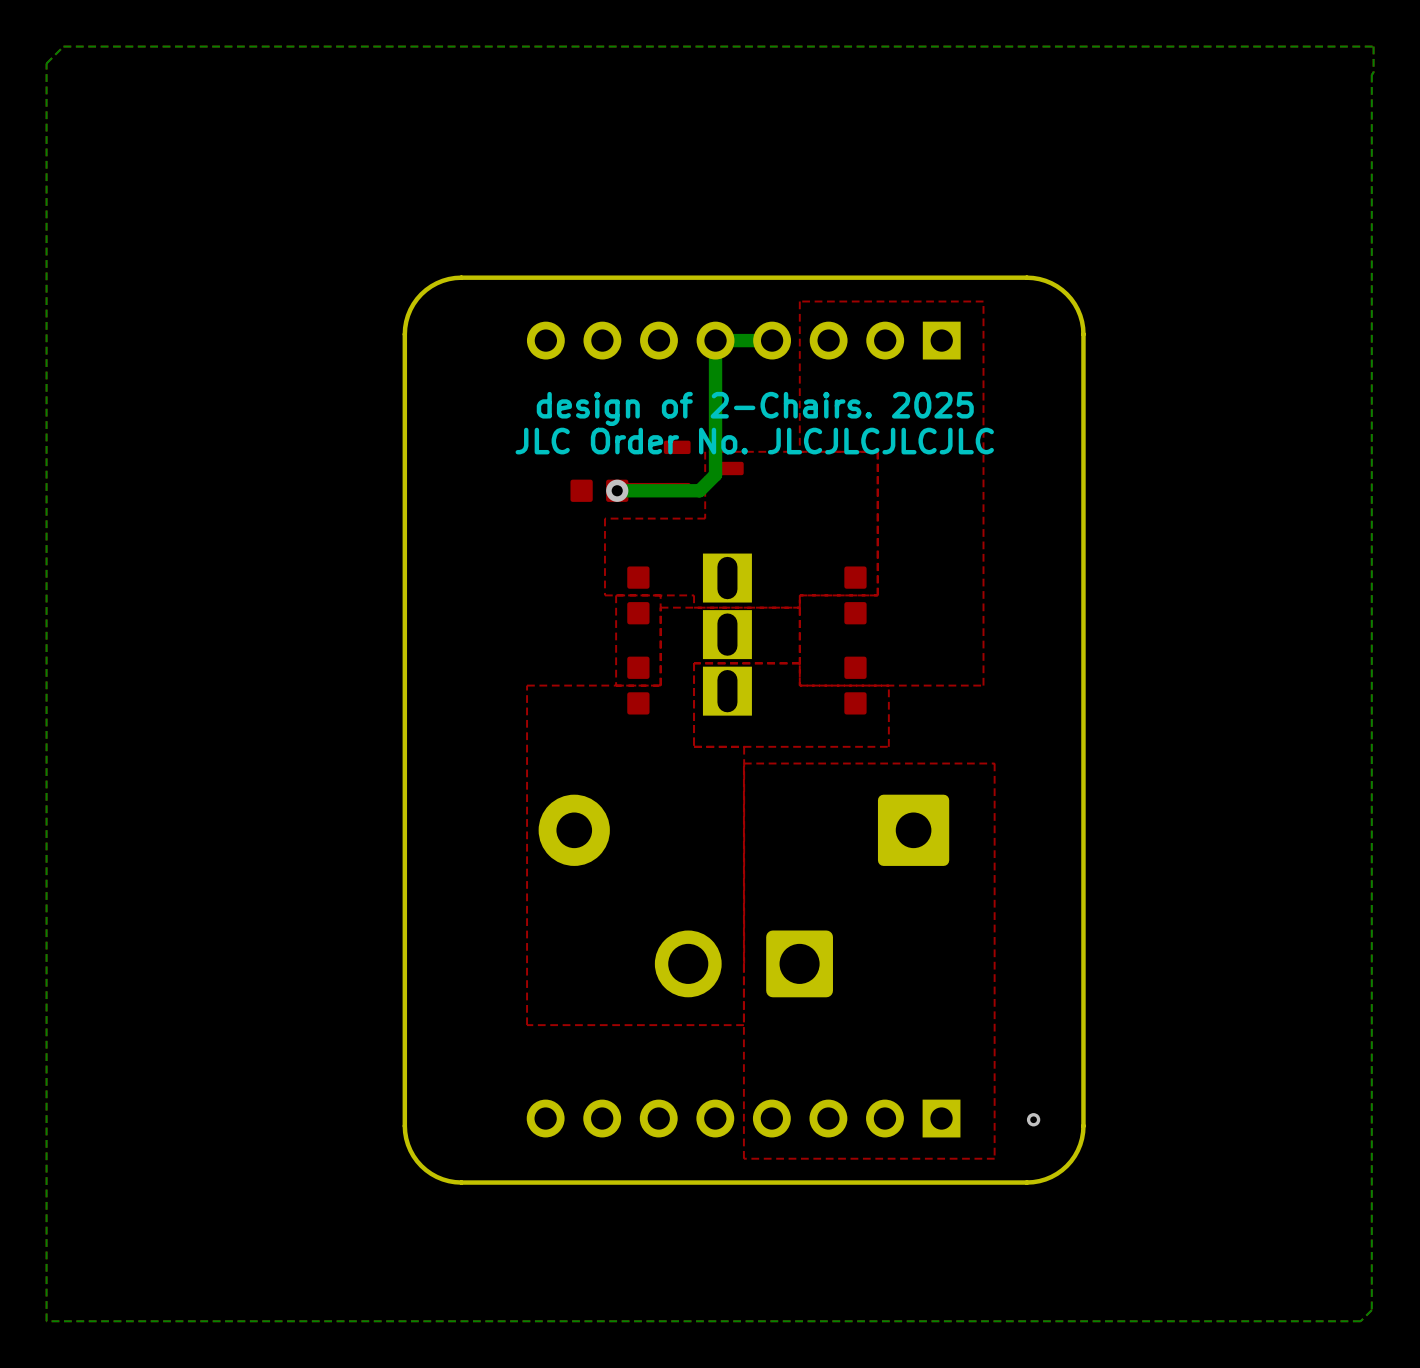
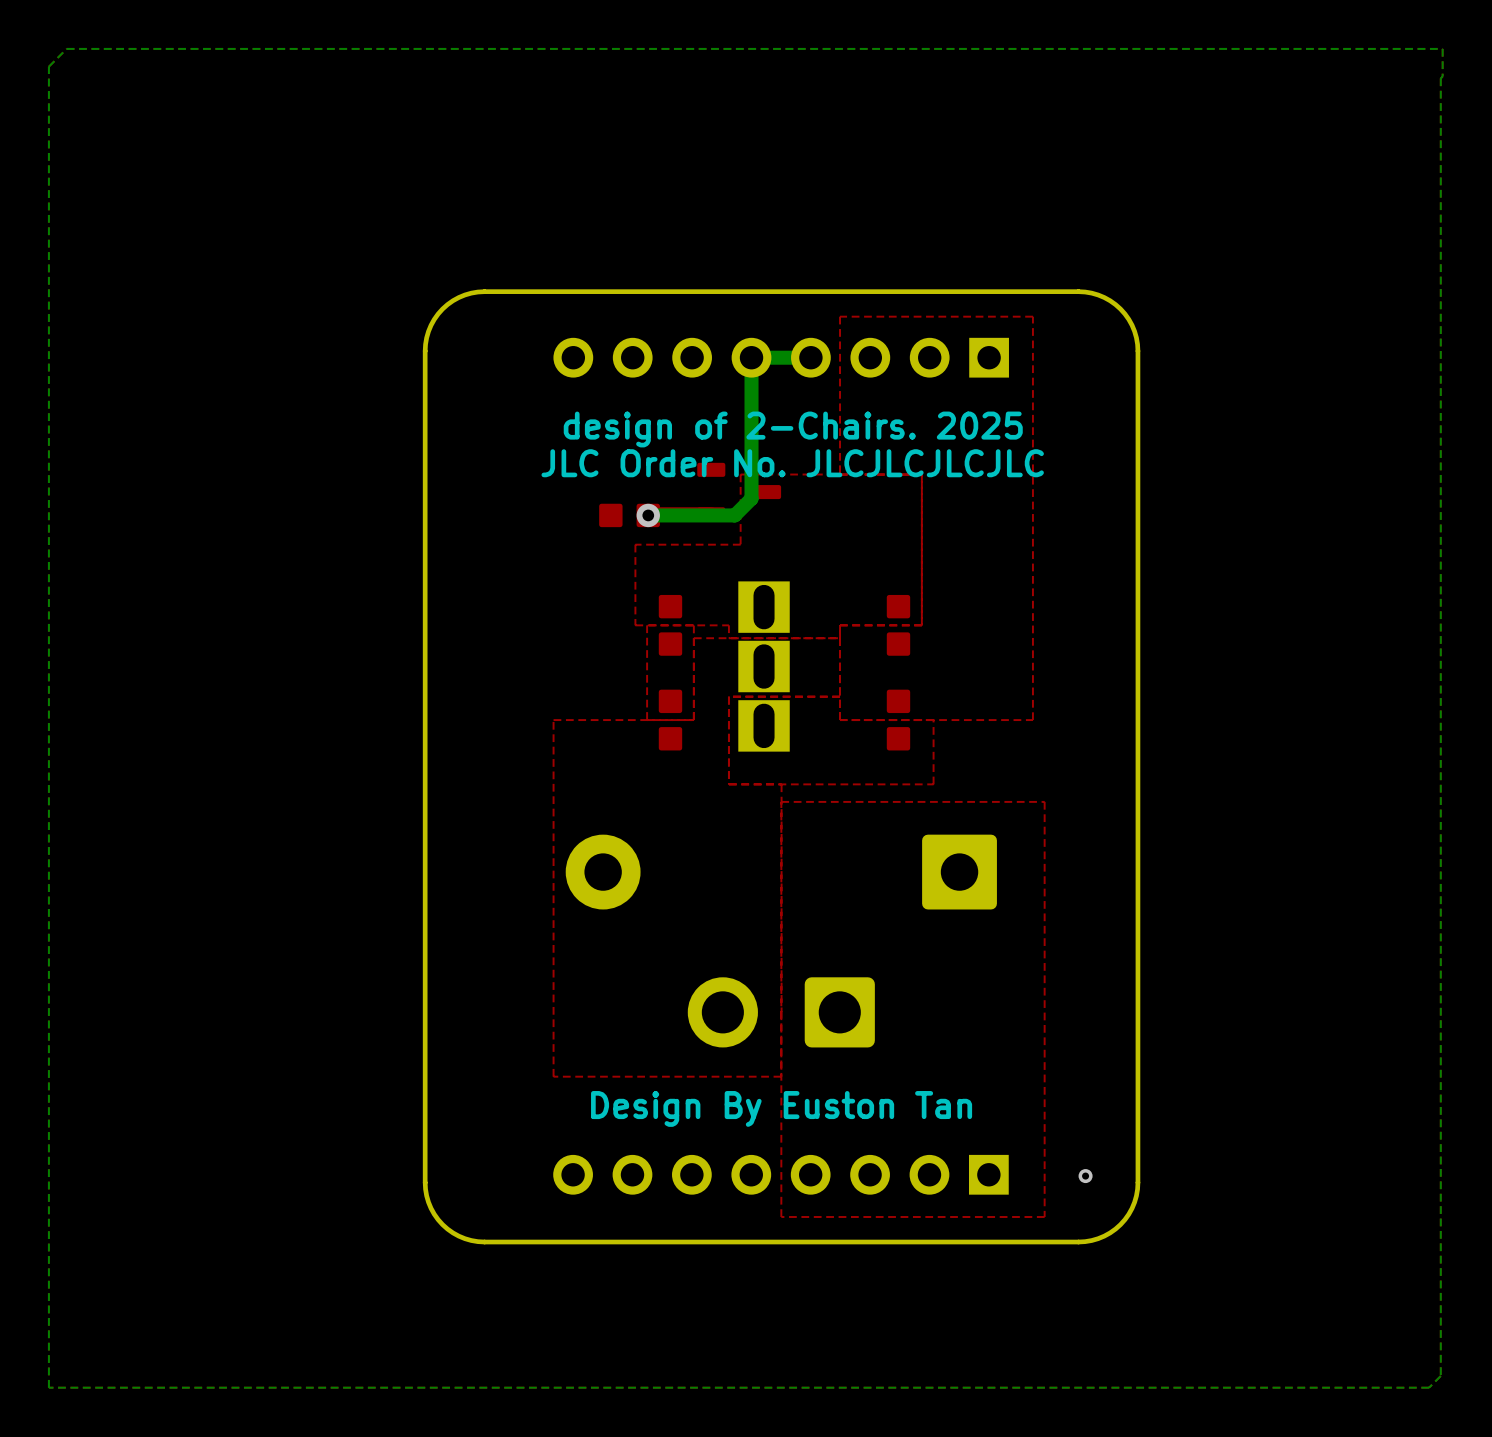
text: none -> Design By Euston Tan (781, 1108)

